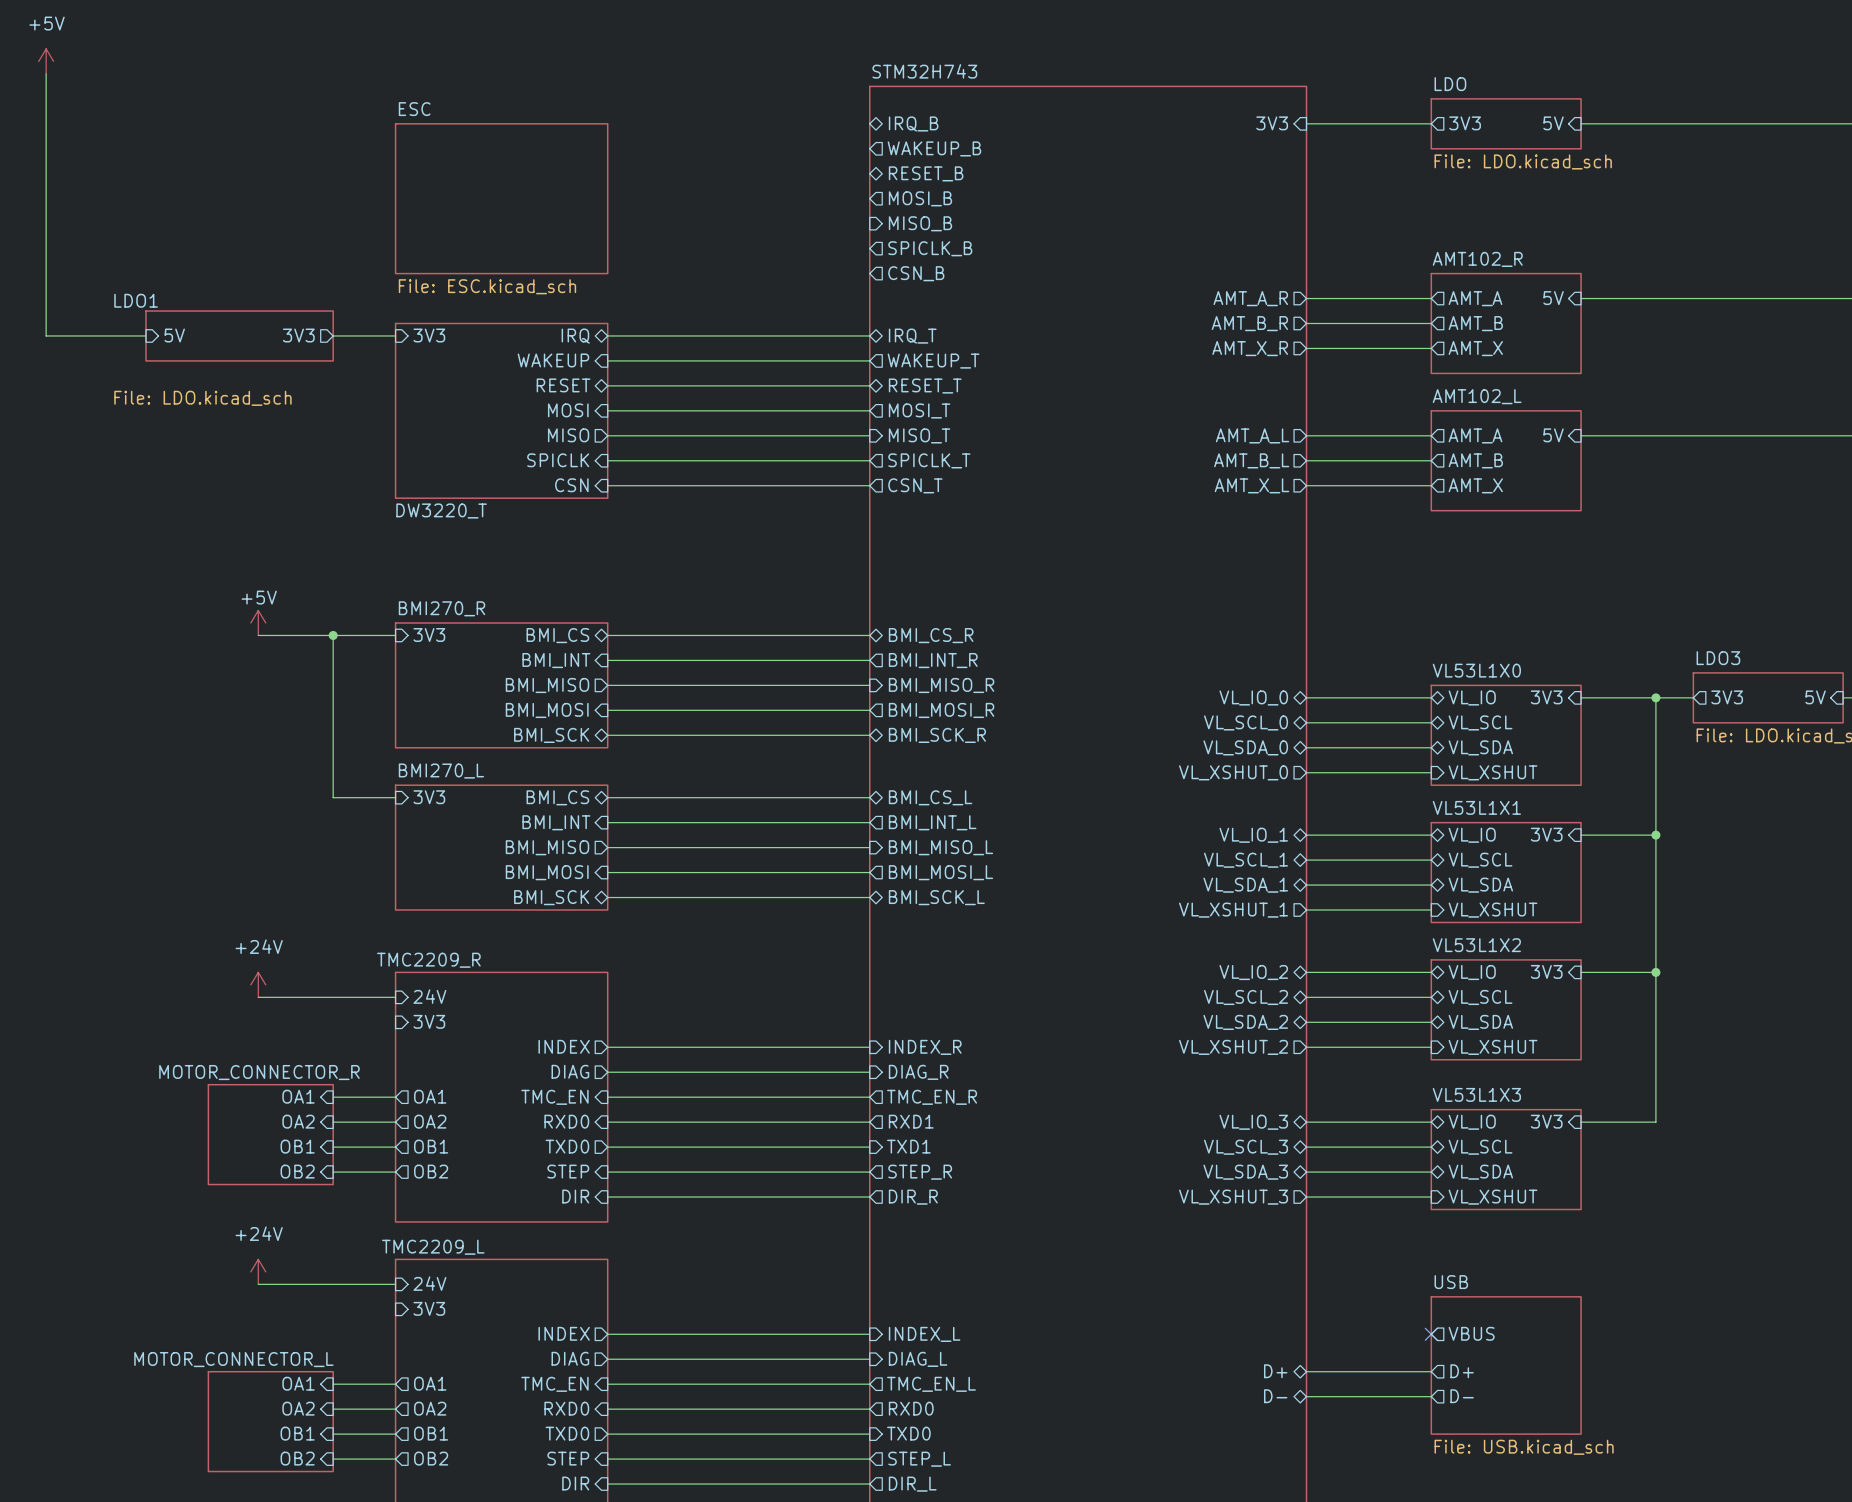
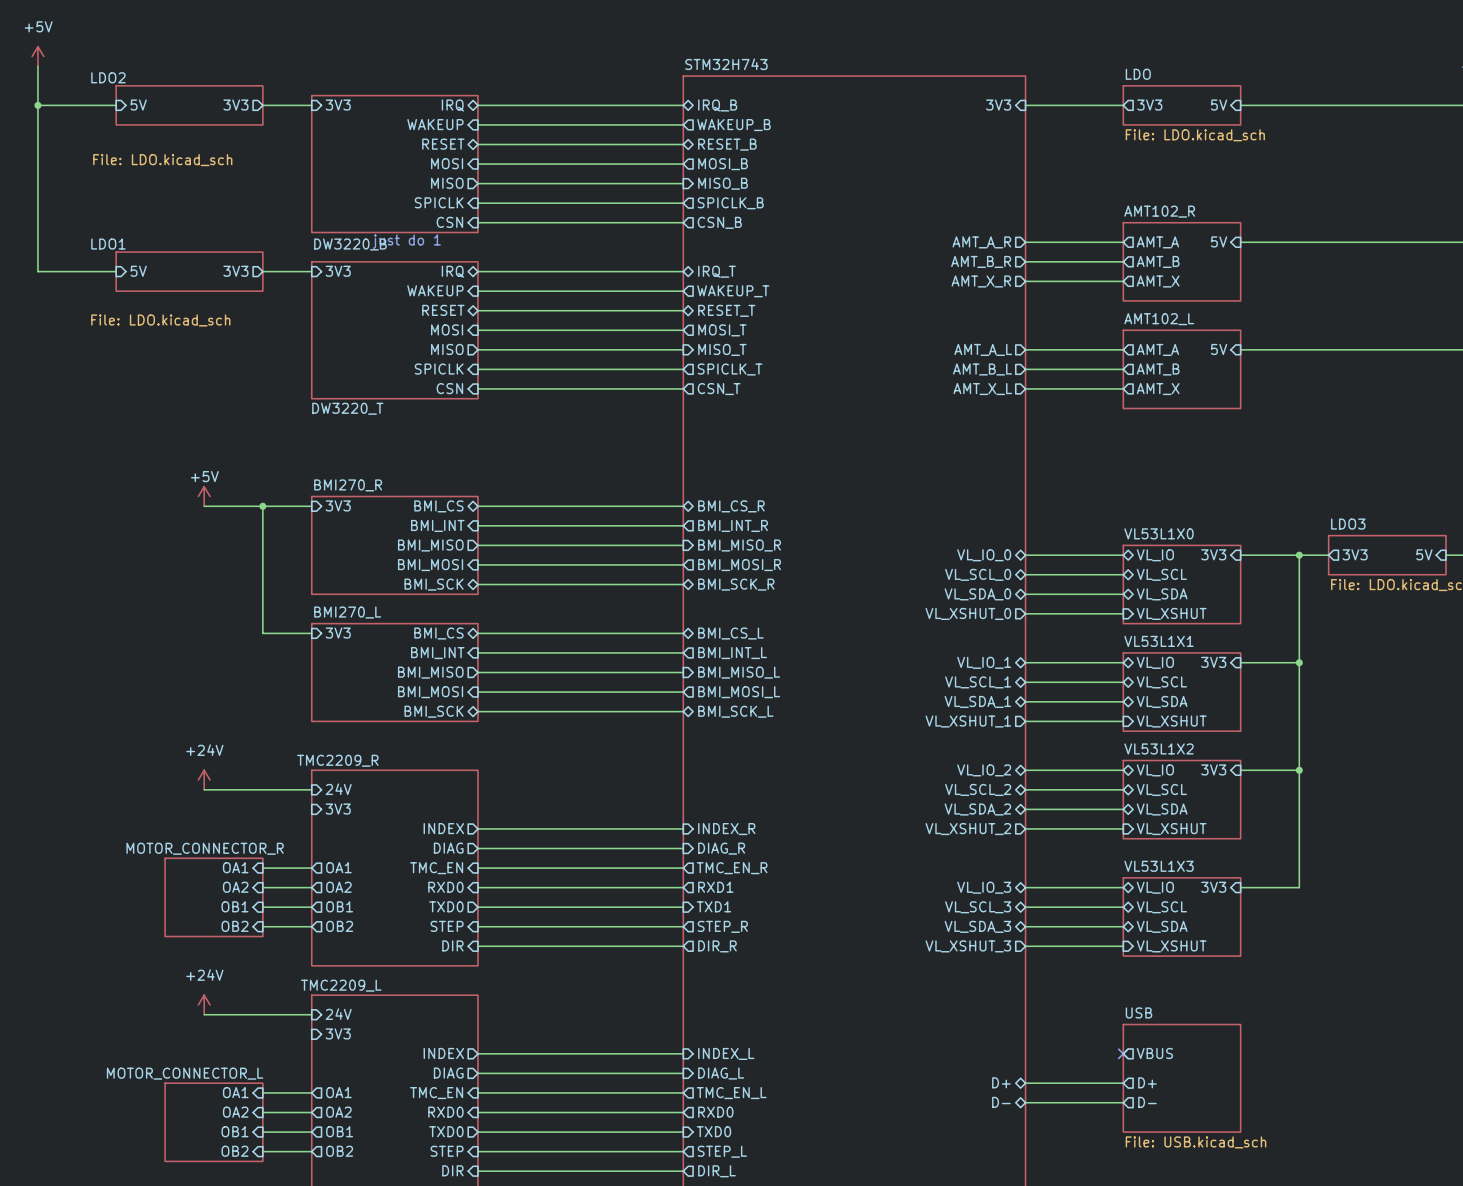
wire: none -> (37, 105) (116, 105)
junction: none -> (37, 105)
sheet pin: none -> 5V (138, 105)
sheet LDO2: none -> File: LDO.kicad_sch (189, 105)
sheet pin: none -> 3V3 (235, 105)
wire: none -> (262, 105) (311, 105)
sheet pin: none -> 3V3 (338, 105)
sheet pin: none -> IRQ (452, 105)
wire: none -> (477, 105) (683, 105)
sheet pin: none -> WAKEUP (435, 124)
wire: none -> (477, 124) (683, 124)
sheet pin: none -> RESET (443, 144)
wire: none -> (477, 144) (683, 144)
sheet ESC: File: ESC.kicad_sch (501, 198) -> none
sheet DW3220_B: none -> (394, 164)
sheet pin: none -> MOSI (447, 163)
wire: none -> (477, 164) (683, 164)
sheet pin: none -> MISO (447, 183)
wire: none -> (477, 183) (683, 183)
sheet pin: none -> SPICLK (439, 202)
wire: none -> (477, 203) (683, 203)
sheet pin: none -> CSN (449, 222)
wire: none -> (477, 222) (683, 222)
text: none -> just do 1 (406, 241)

